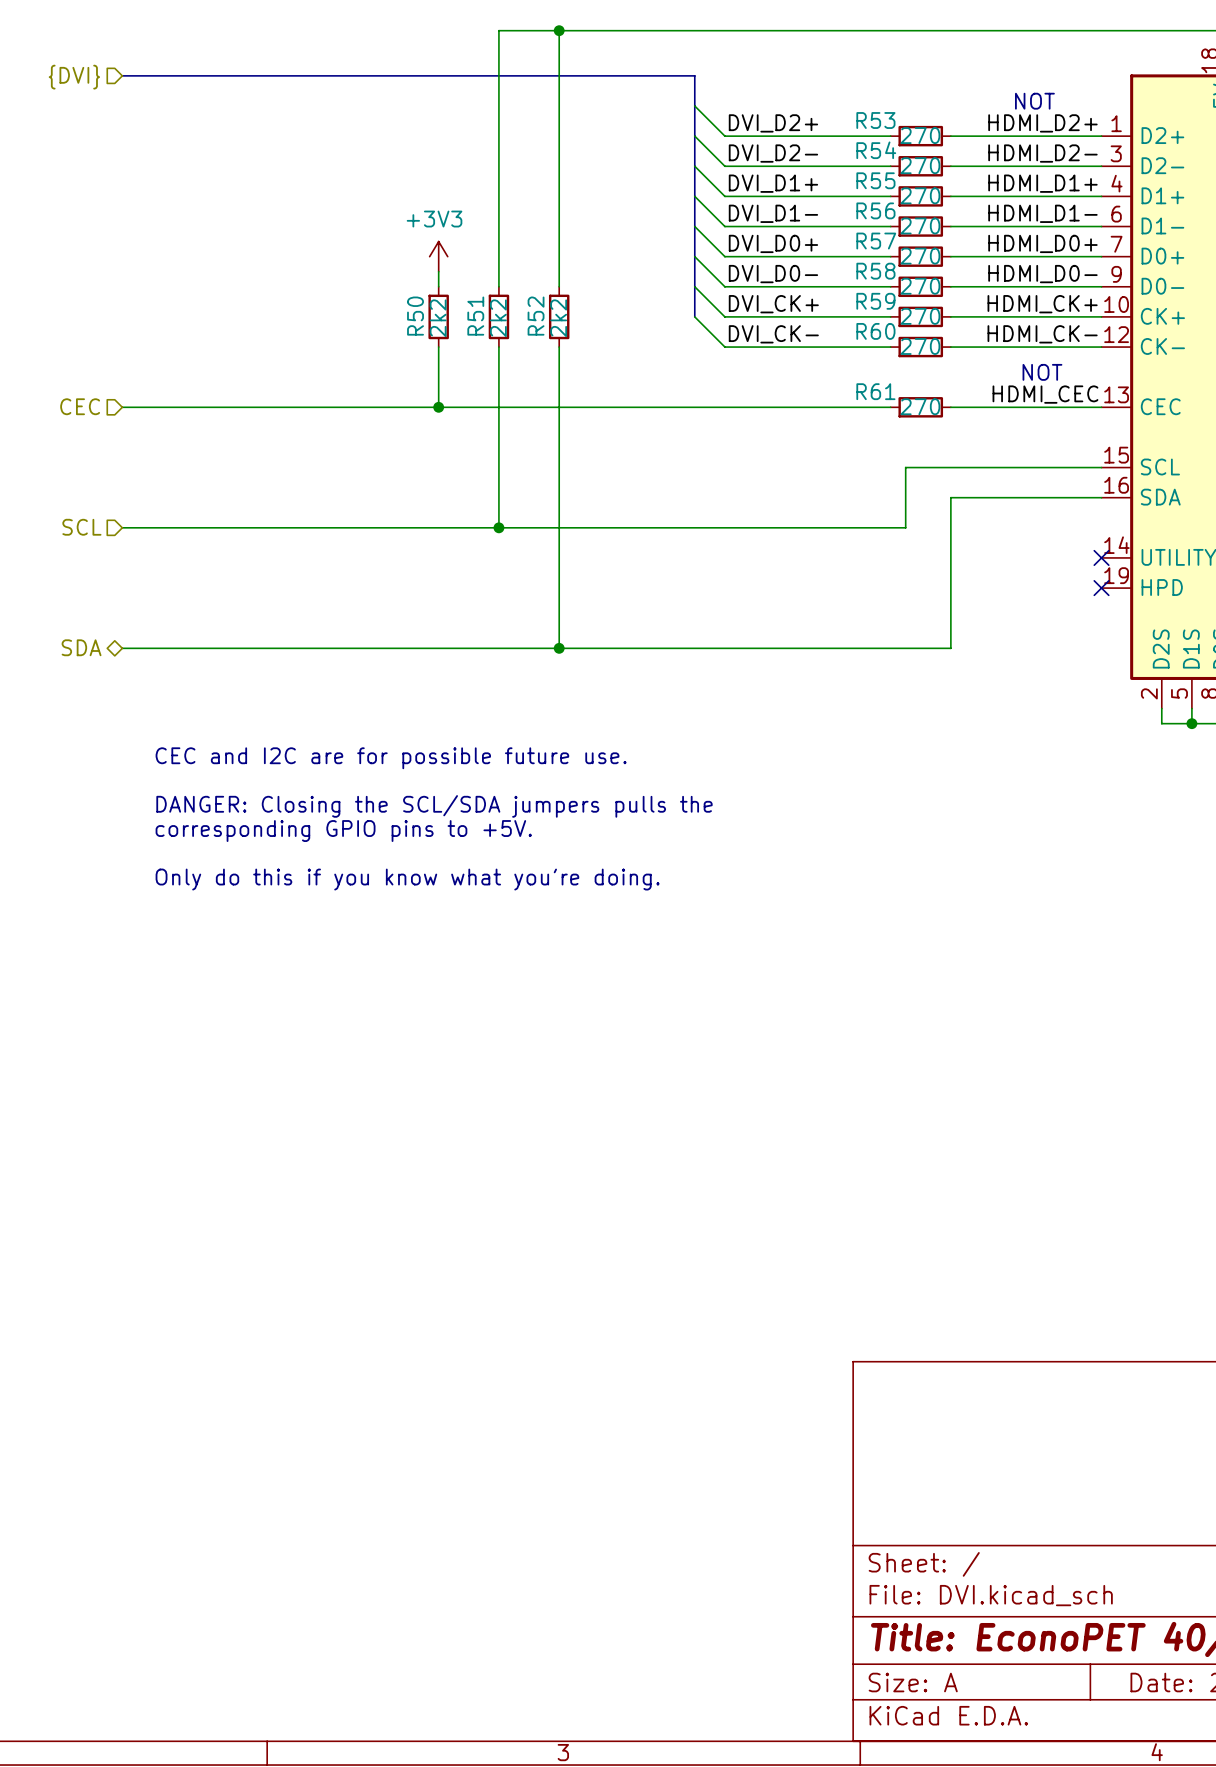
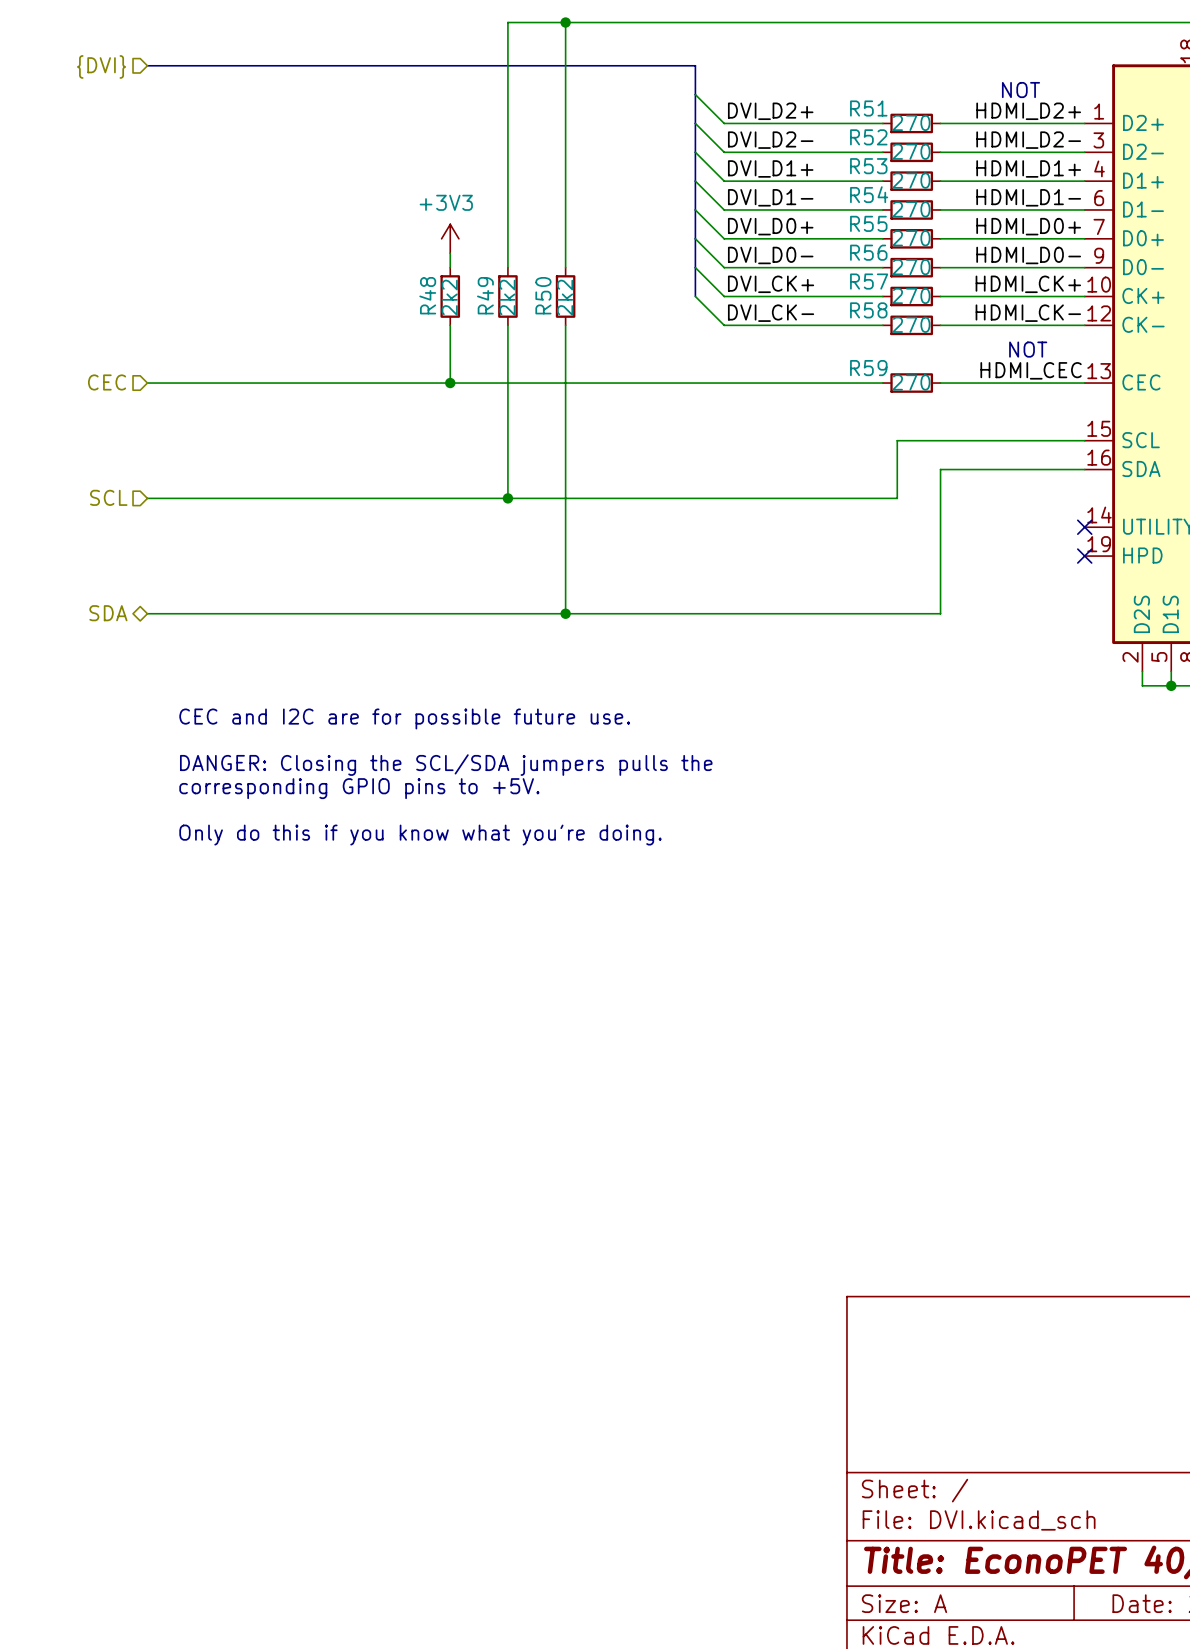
R53 name: R53 (875, 120) -> R51 (868, 108)
R54 name: R54 (876, 150) -> R52 (868, 137)
R55 name: R55 (875, 180) -> R53 (868, 166)
R56 name: R56 (875, 210) -> R54 (869, 194)
R57 name: R57 (876, 241) -> R55 (868, 223)
R58 name: R58 (875, 271) -> R56 (868, 252)
R59 name: R59 (875, 301) -> R57 (869, 281)
R50 name: R50 (415, 316) -> R48 (427, 295)
R51 name: R51 (475, 316) -> R49 (485, 295)
R52 name: R52 (536, 316) -> R50 (543, 295)
R60 name: R60 (875, 331) -> R58 (868, 310)
R61 name: R61 (875, 391) -> R59 (868, 368)

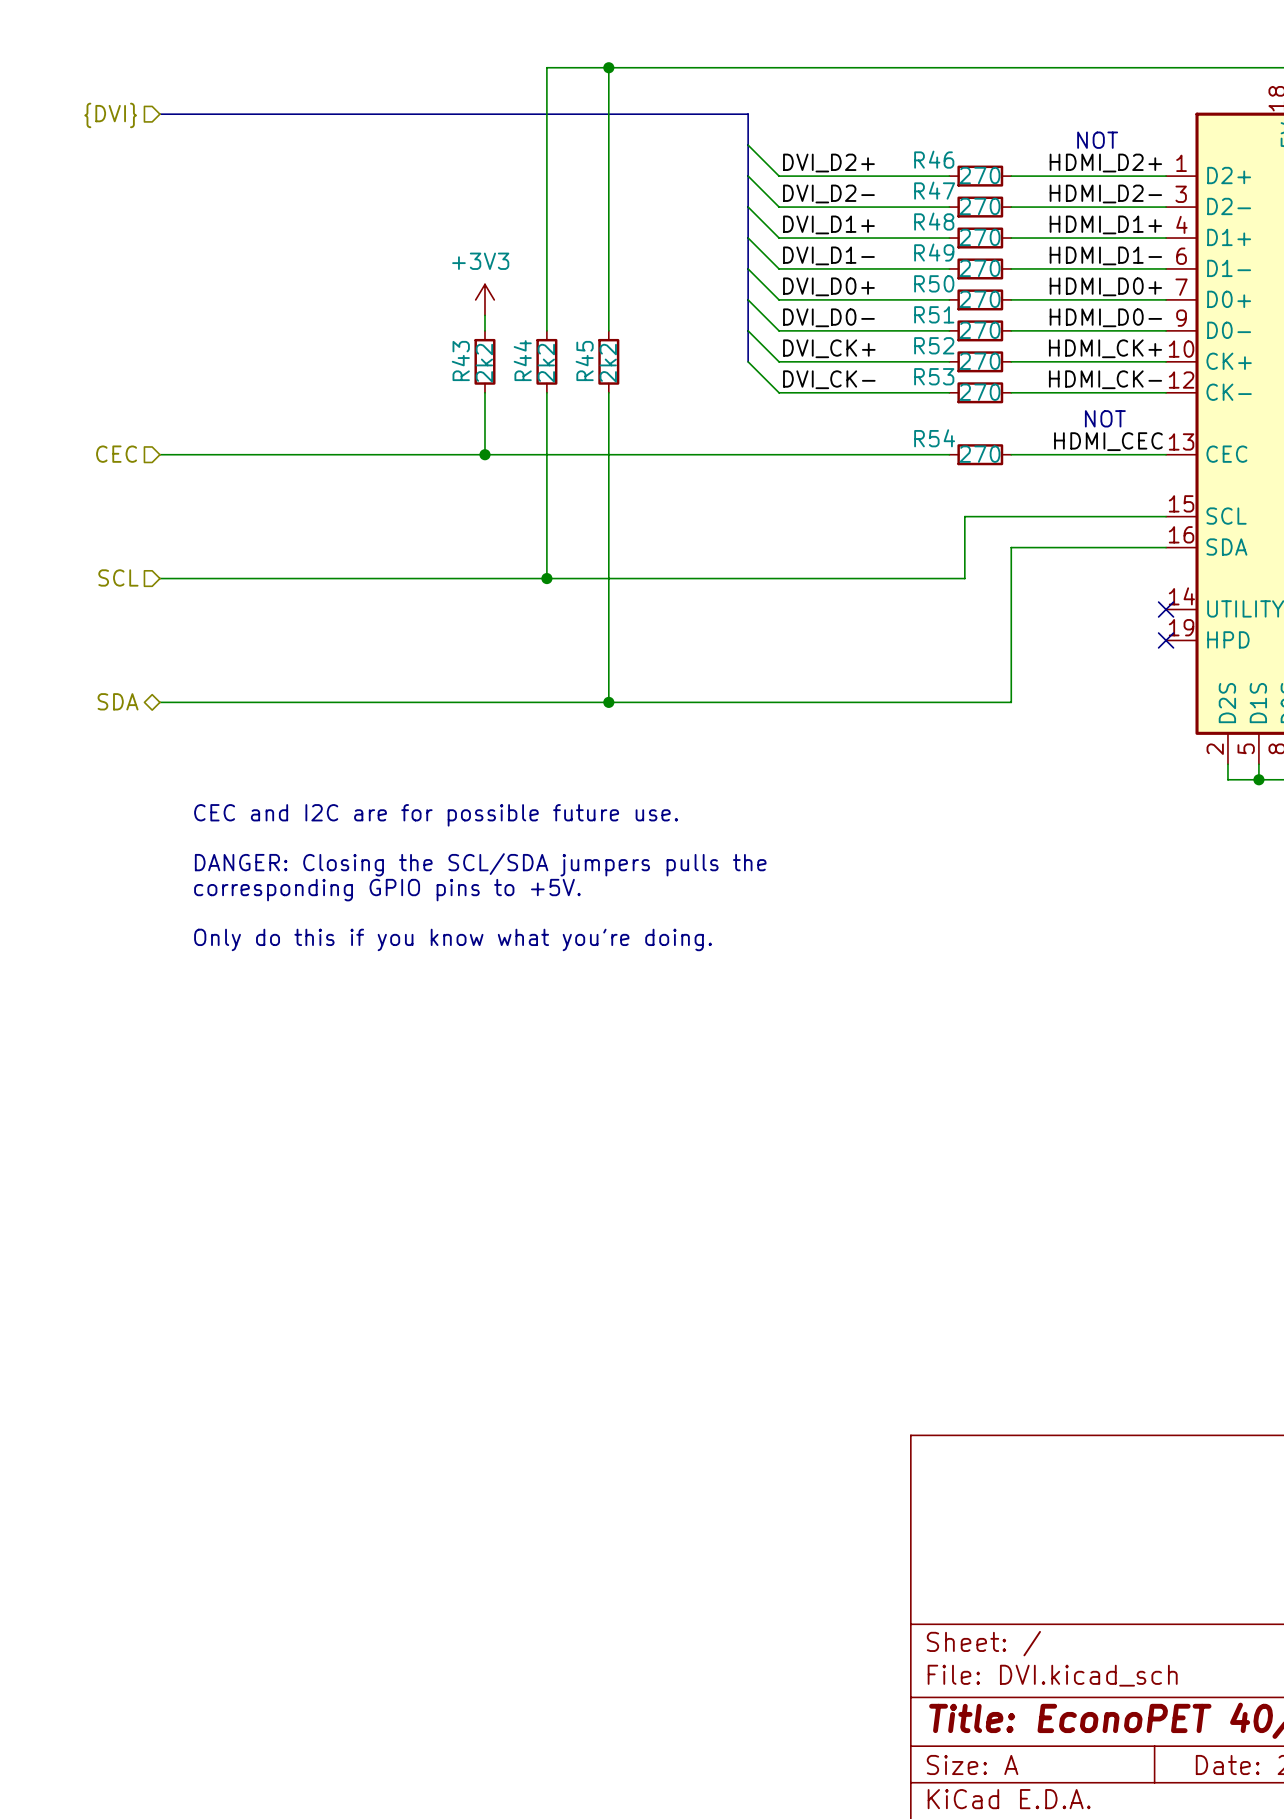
R51 name: R51 (868, 108) -> R46 (934, 159)
R52 name: R52 (868, 137) -> R47 (934, 190)
R53 name: R53 (868, 166) -> R48 (934, 221)
R54 name: R54 (869, 194) -> R49 (934, 252)
R55 name: R55 (868, 223) -> R50 (934, 283)
R56 name: R56 (868, 252) -> R51 (934, 314)
R57 name: R57 (869, 281) -> R52 (934, 345)
R48 name: R48 (427, 295) -> R43 (460, 360)
R49 name: R49 (485, 295) -> R44 (522, 360)
R50 name: R50 (543, 295) -> R45 (584, 360)
R58 name: R58 (868, 310) -> R53 (934, 376)
R59 name: R59 (868, 368) -> R54 (934, 438)

